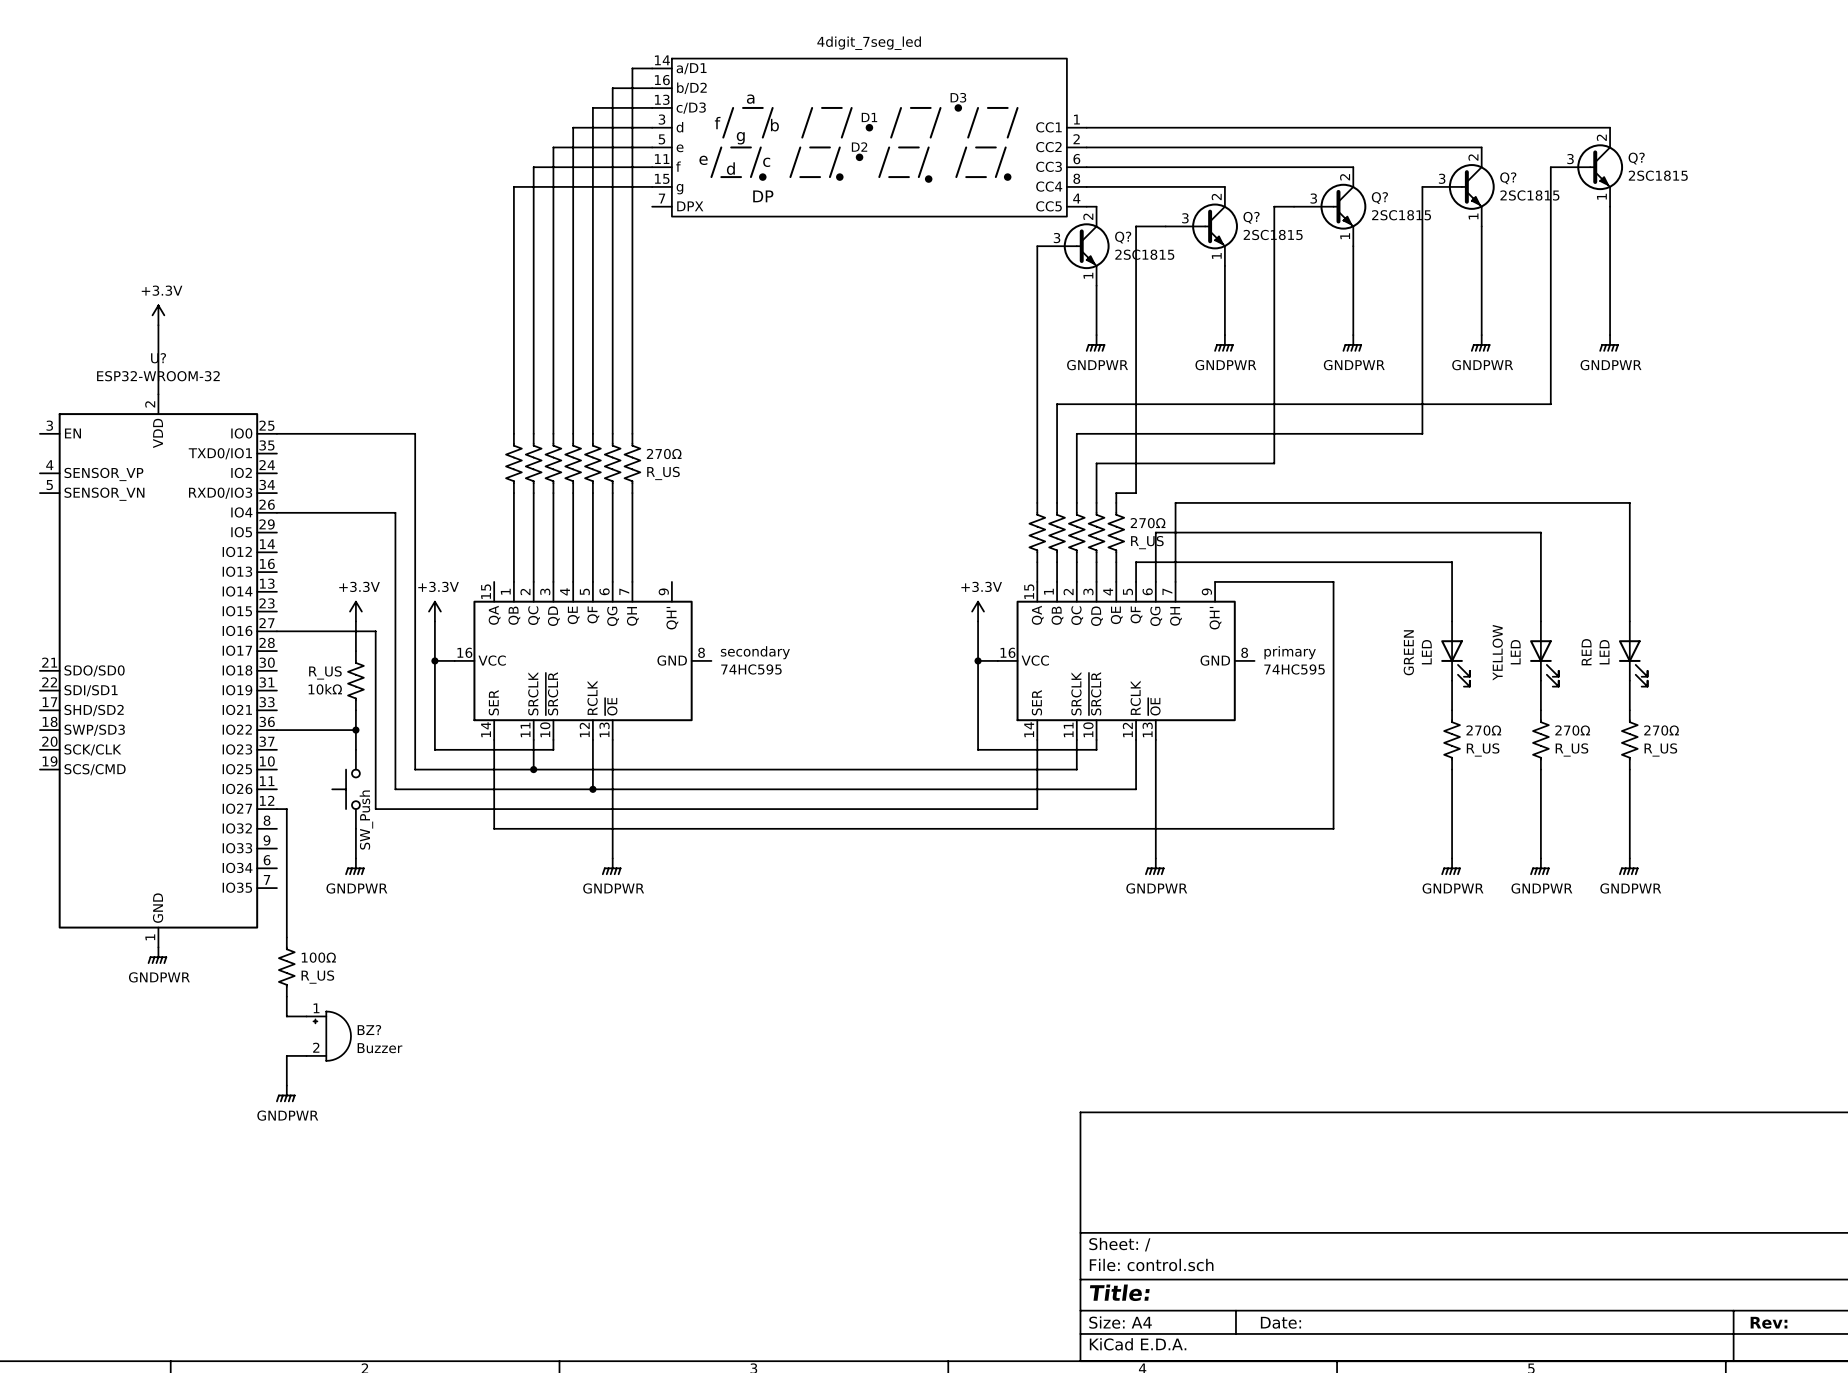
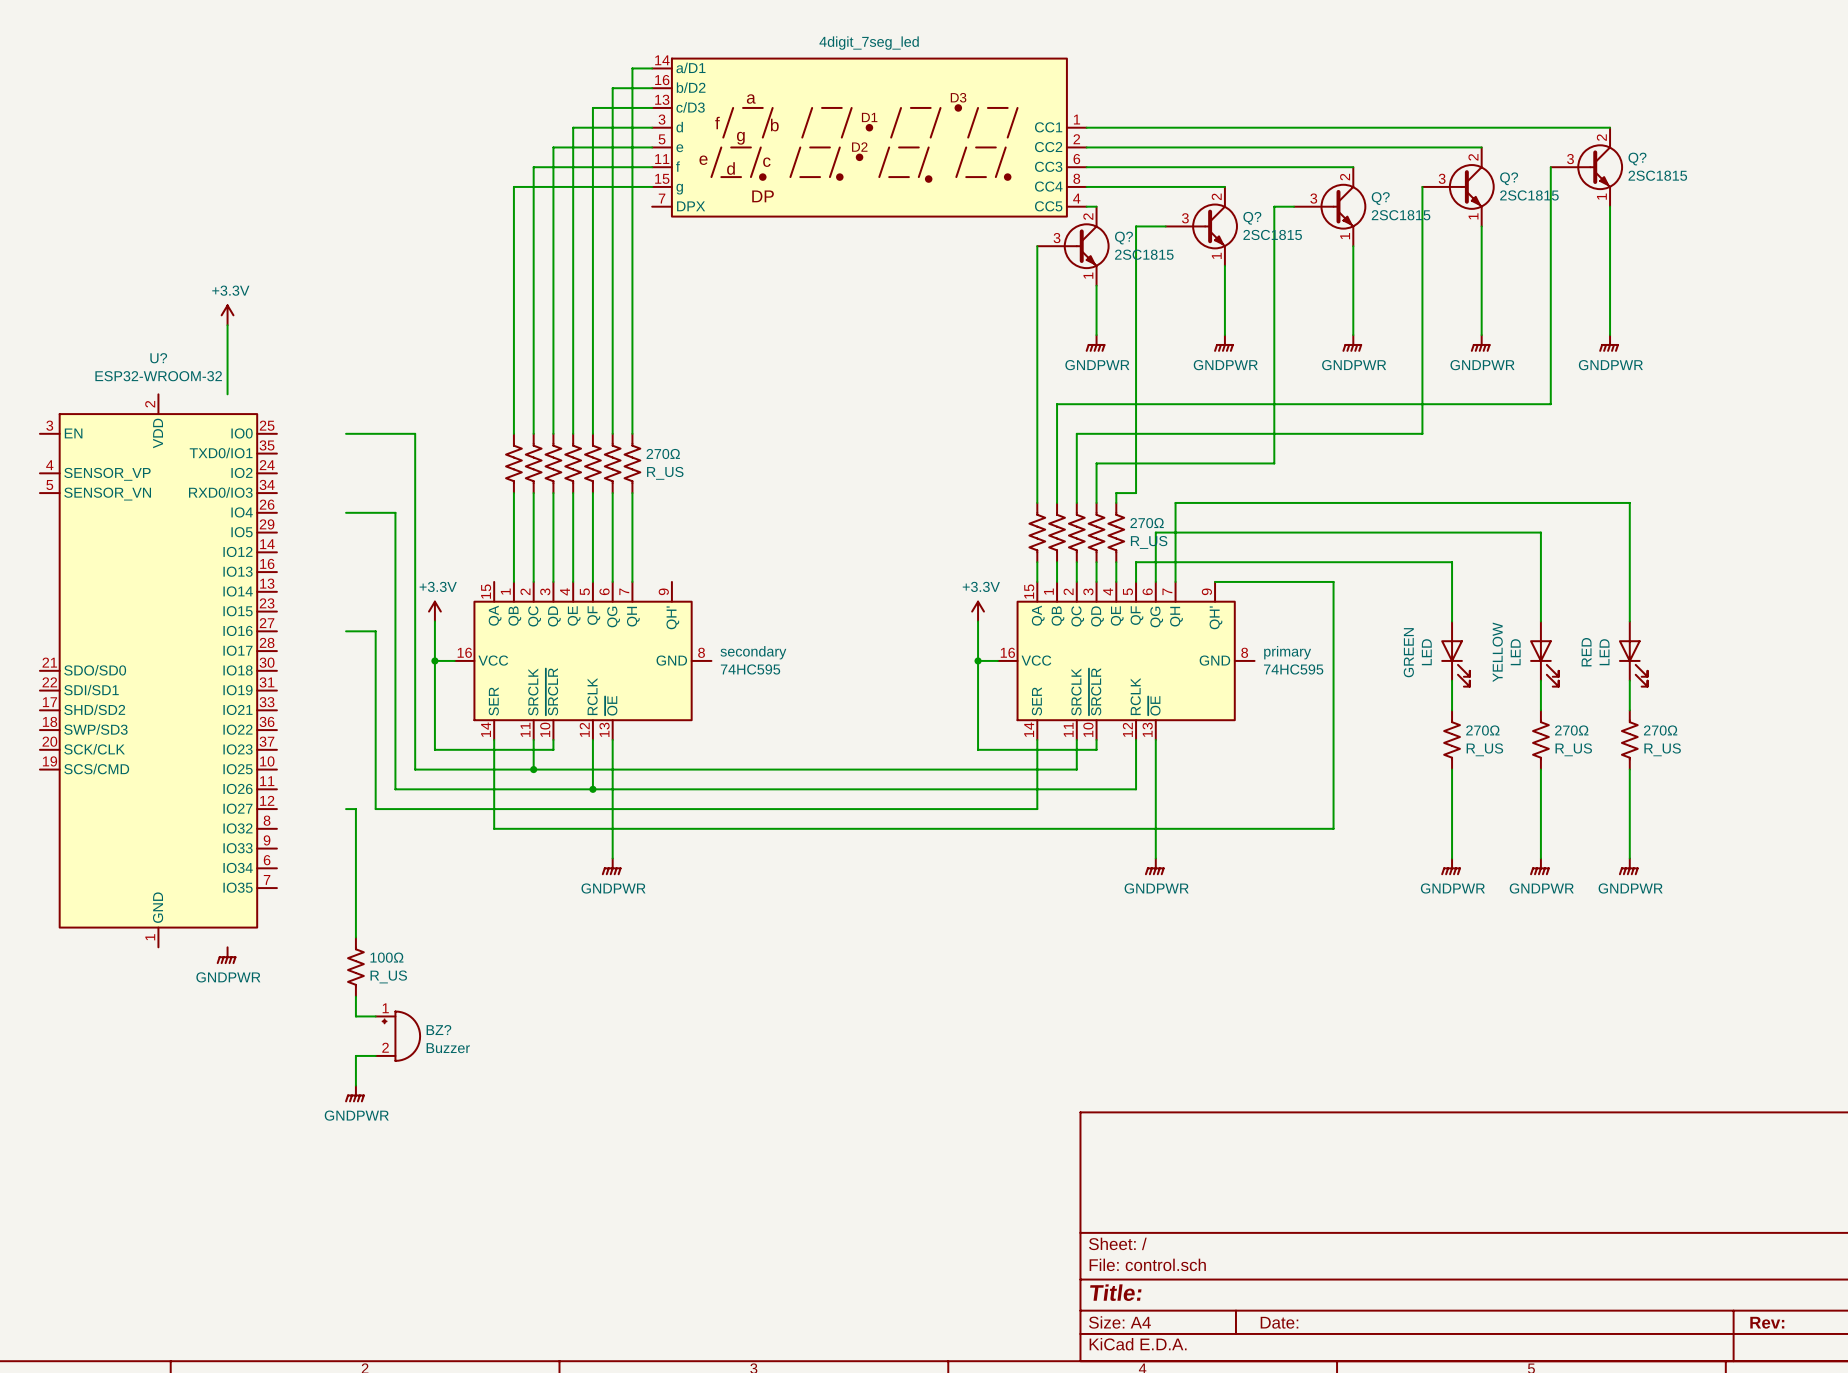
power symbol position: +3.3V (158, 315) -> +3.3V (227, 315)
wire: (158, 325) (158, 394) -> (227, 325) (227, 394)
wire: (276, 433) (346, 433) -> none
wire: (276, 512) (346, 512) -> none
power symbol: +3.3V (355, 611) -> none
wire: (355, 621) (355, 651) -> none
wire: (276, 631) (346, 631) -> none
10kΩ: R_US (355, 680) -> none
wire: (355, 710) (355, 749) -> none
wire: (276, 730) (355, 730) -> none
junction: (355, 730) -> none
part: SW_Push (346, 789) -> none
wire: (276, 809) (286, 809) (286, 937) -> none
wire: none -> (355, 858) (355, 937)
power symbol: GNDPWR (354, 866) -> none
power symbol position: GNDPWR (157, 955) -> GNDPWR (226, 955)
100Ω position: (286, 967) -> (355, 967)
wire: (286, 996) (286, 1016) (306, 1016) -> (355, 996) (355, 1016) (375, 1016)
BZ? position: (328, 1036) -> (397, 1036)
wire: (306, 1055) (286, 1055) (286, 1085) -> (375, 1055) (355, 1055) (355, 1085)
power symbol position: GNDPWR (285, 1093) -> GNDPWR (354, 1093)

